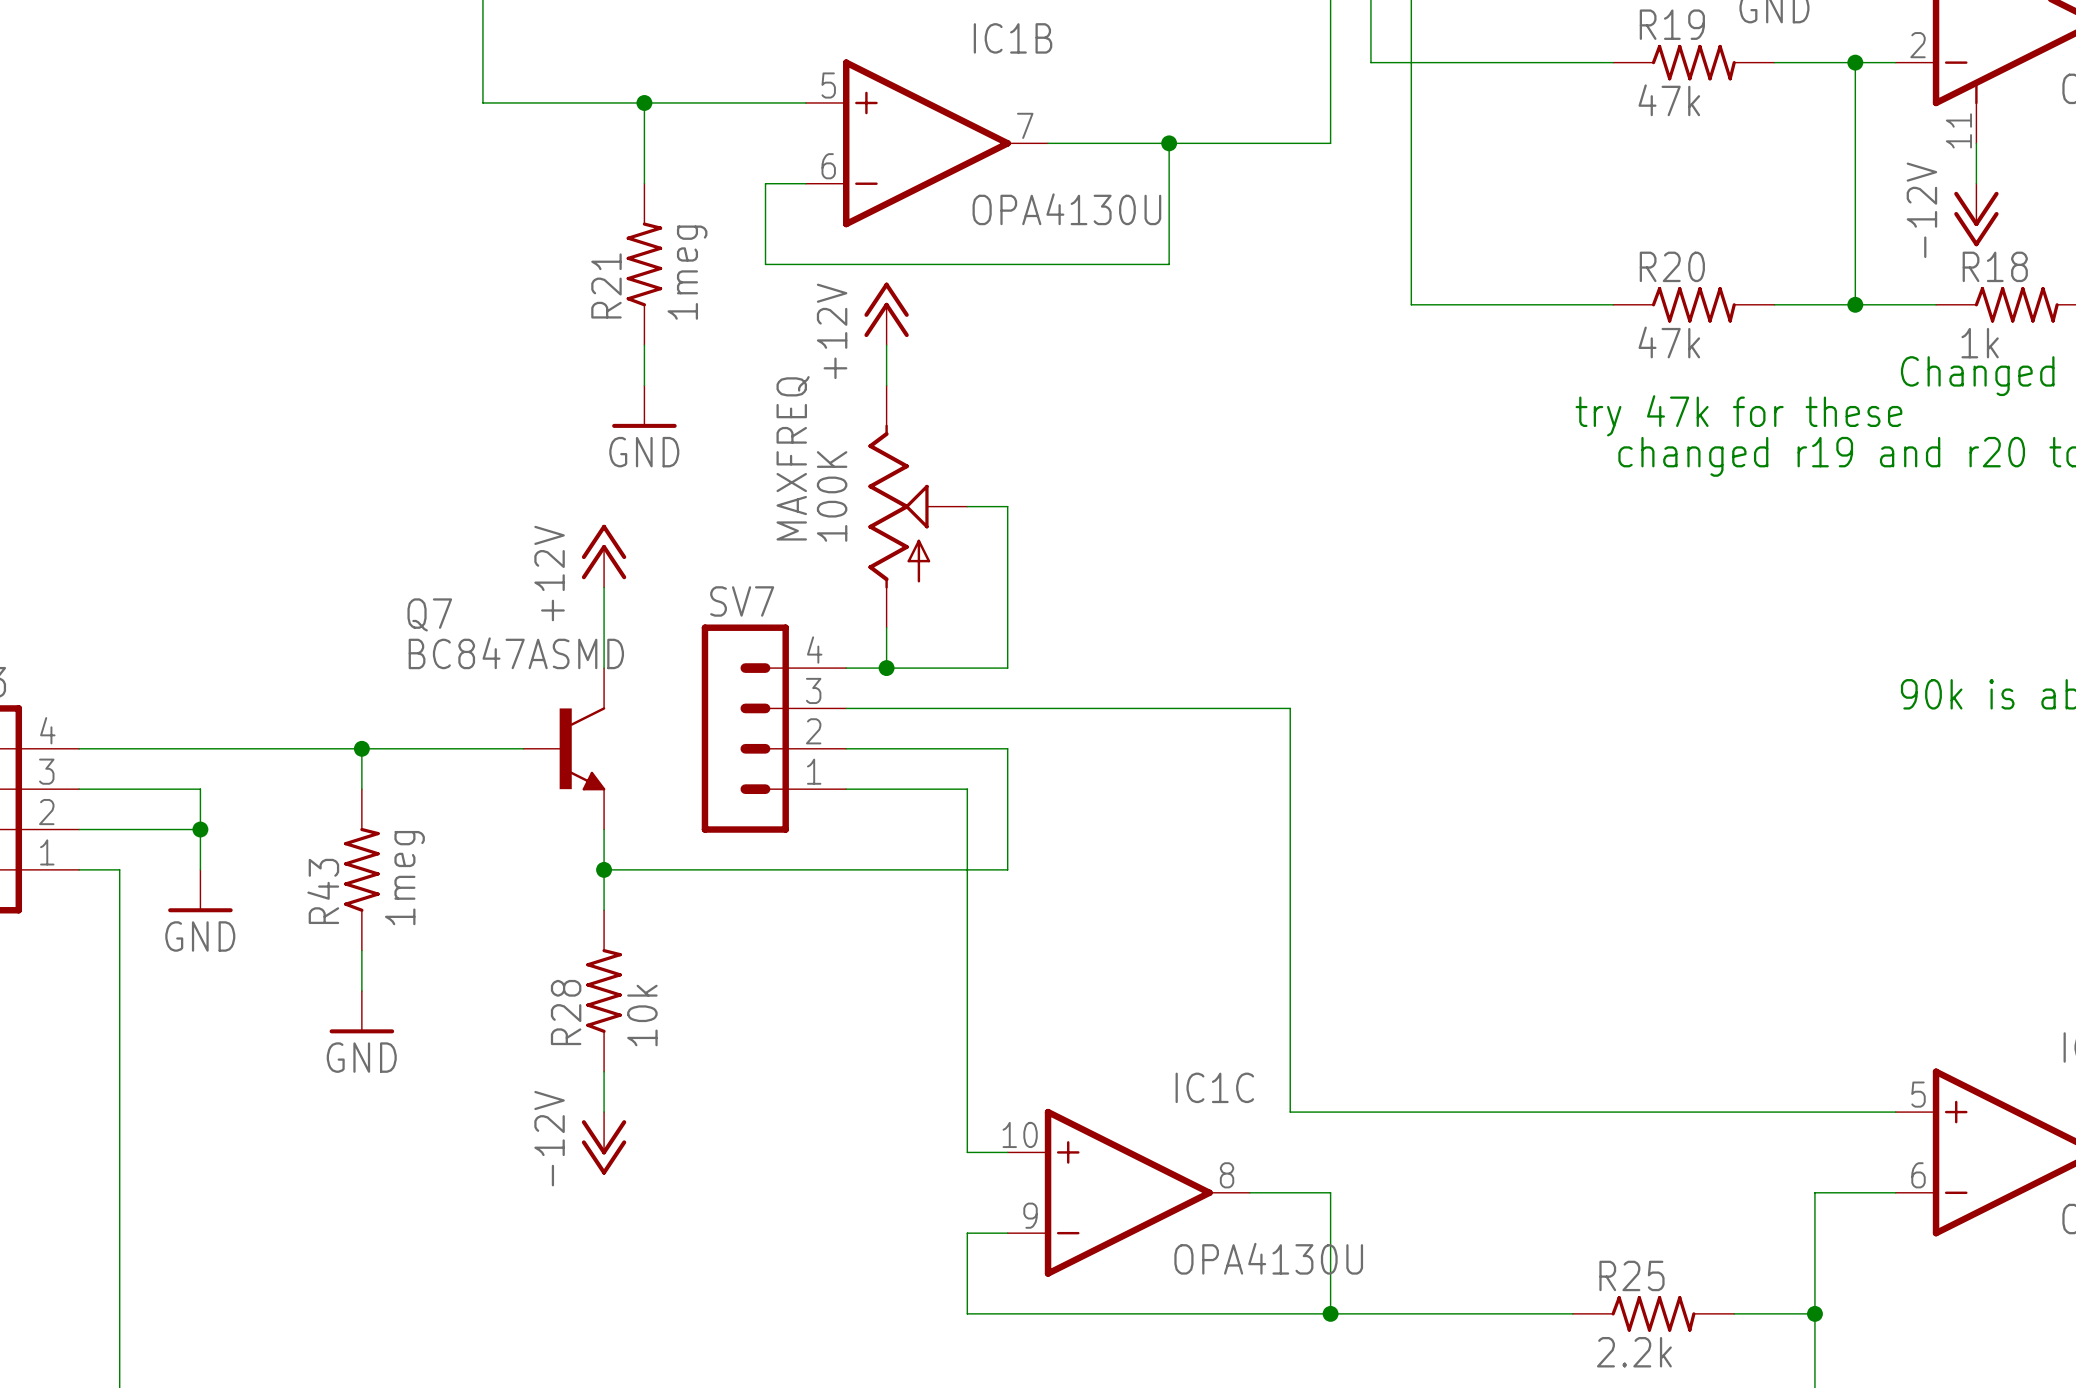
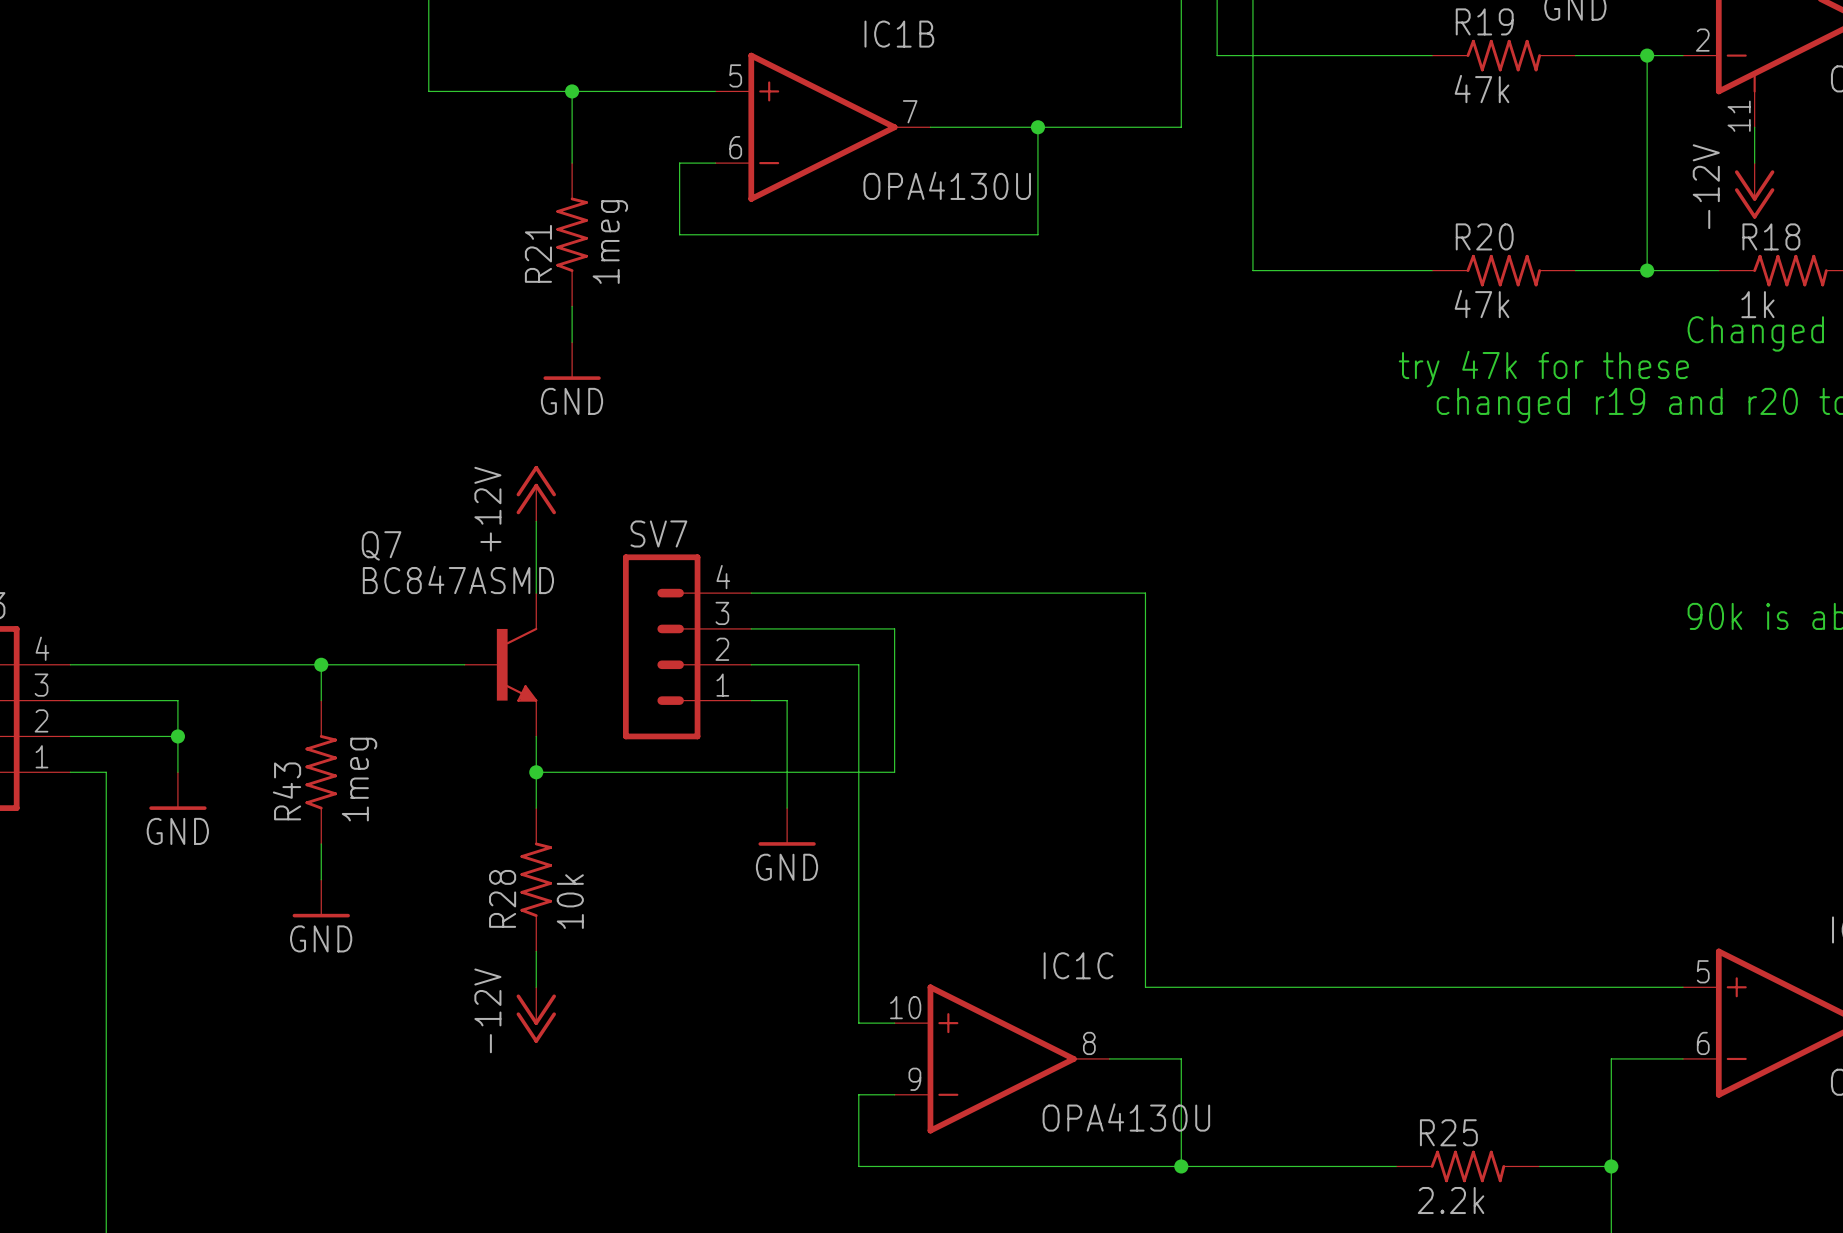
power symbol: +12V (886, 313) -> none
wire: (886, 345) (886, 385) -> none
MAXFREQ: 100K (917, 506) -> none
wire: (967, 506) (1007, 506) (1007, 668) -> none
wire: (886, 627) (886, 668) -> none
junction: (886, 668) -> none
wire: (1007, 708) (1290, 708) -> (894, 593) (1145, 593) (1145, 628)
wire: (967, 748) (1007, 748) -> (894, 628) (894, 664)
wire: (886, 789) (967, 789) -> (858, 664) (858, 700)
wire: none -> (787, 700) (787, 808)
power symbol: none -> GND (787, 826)

